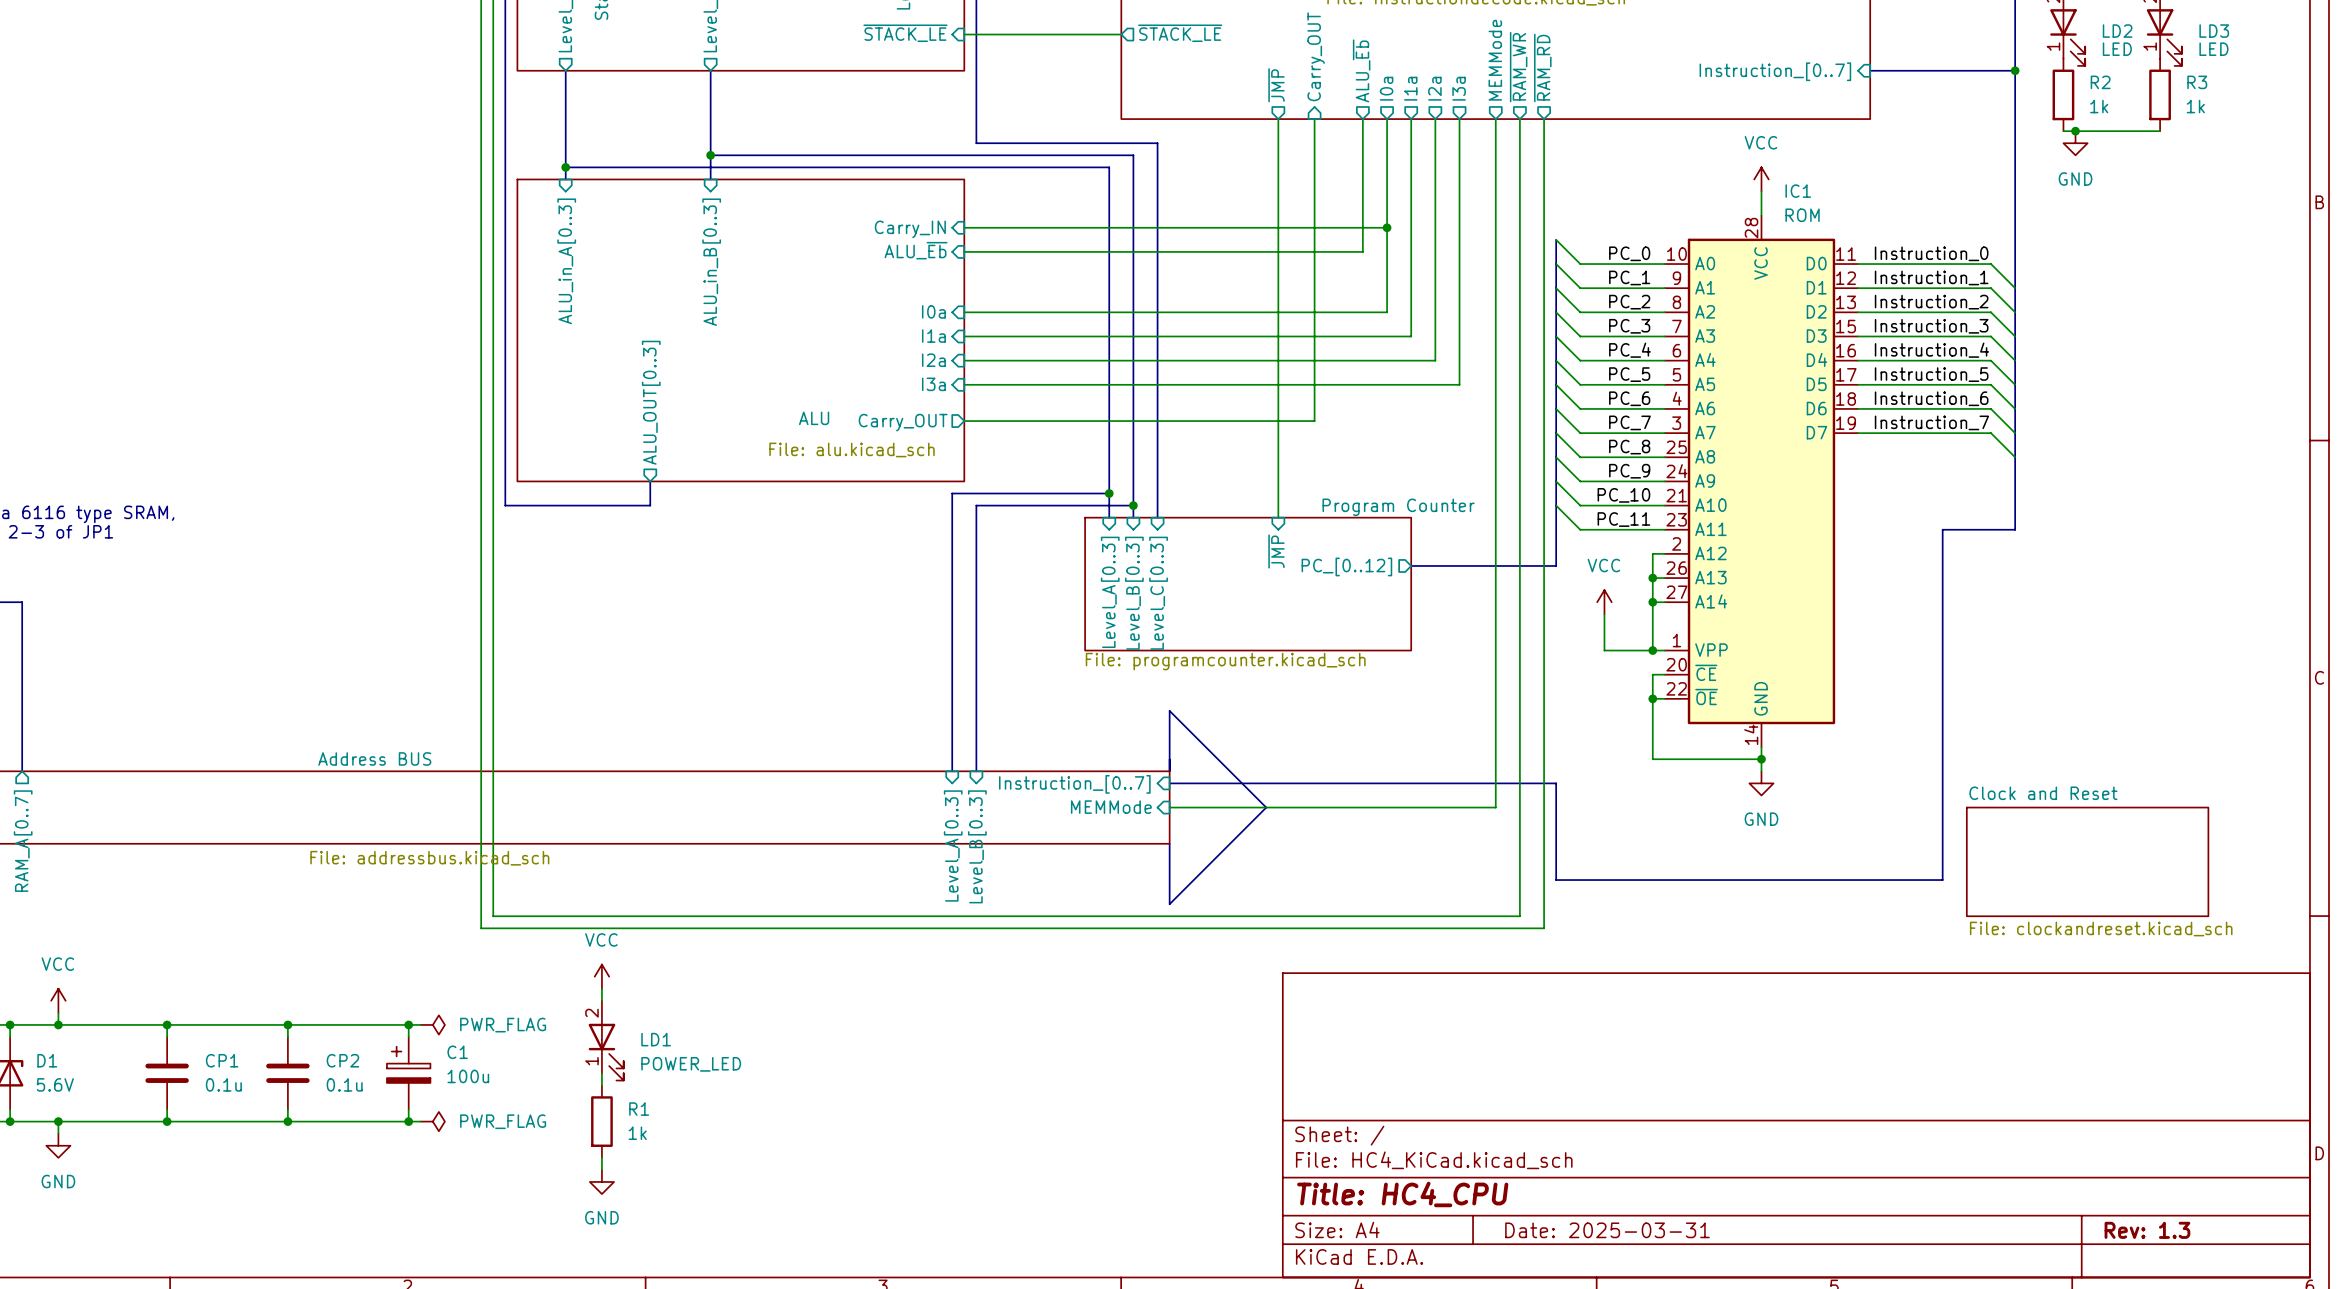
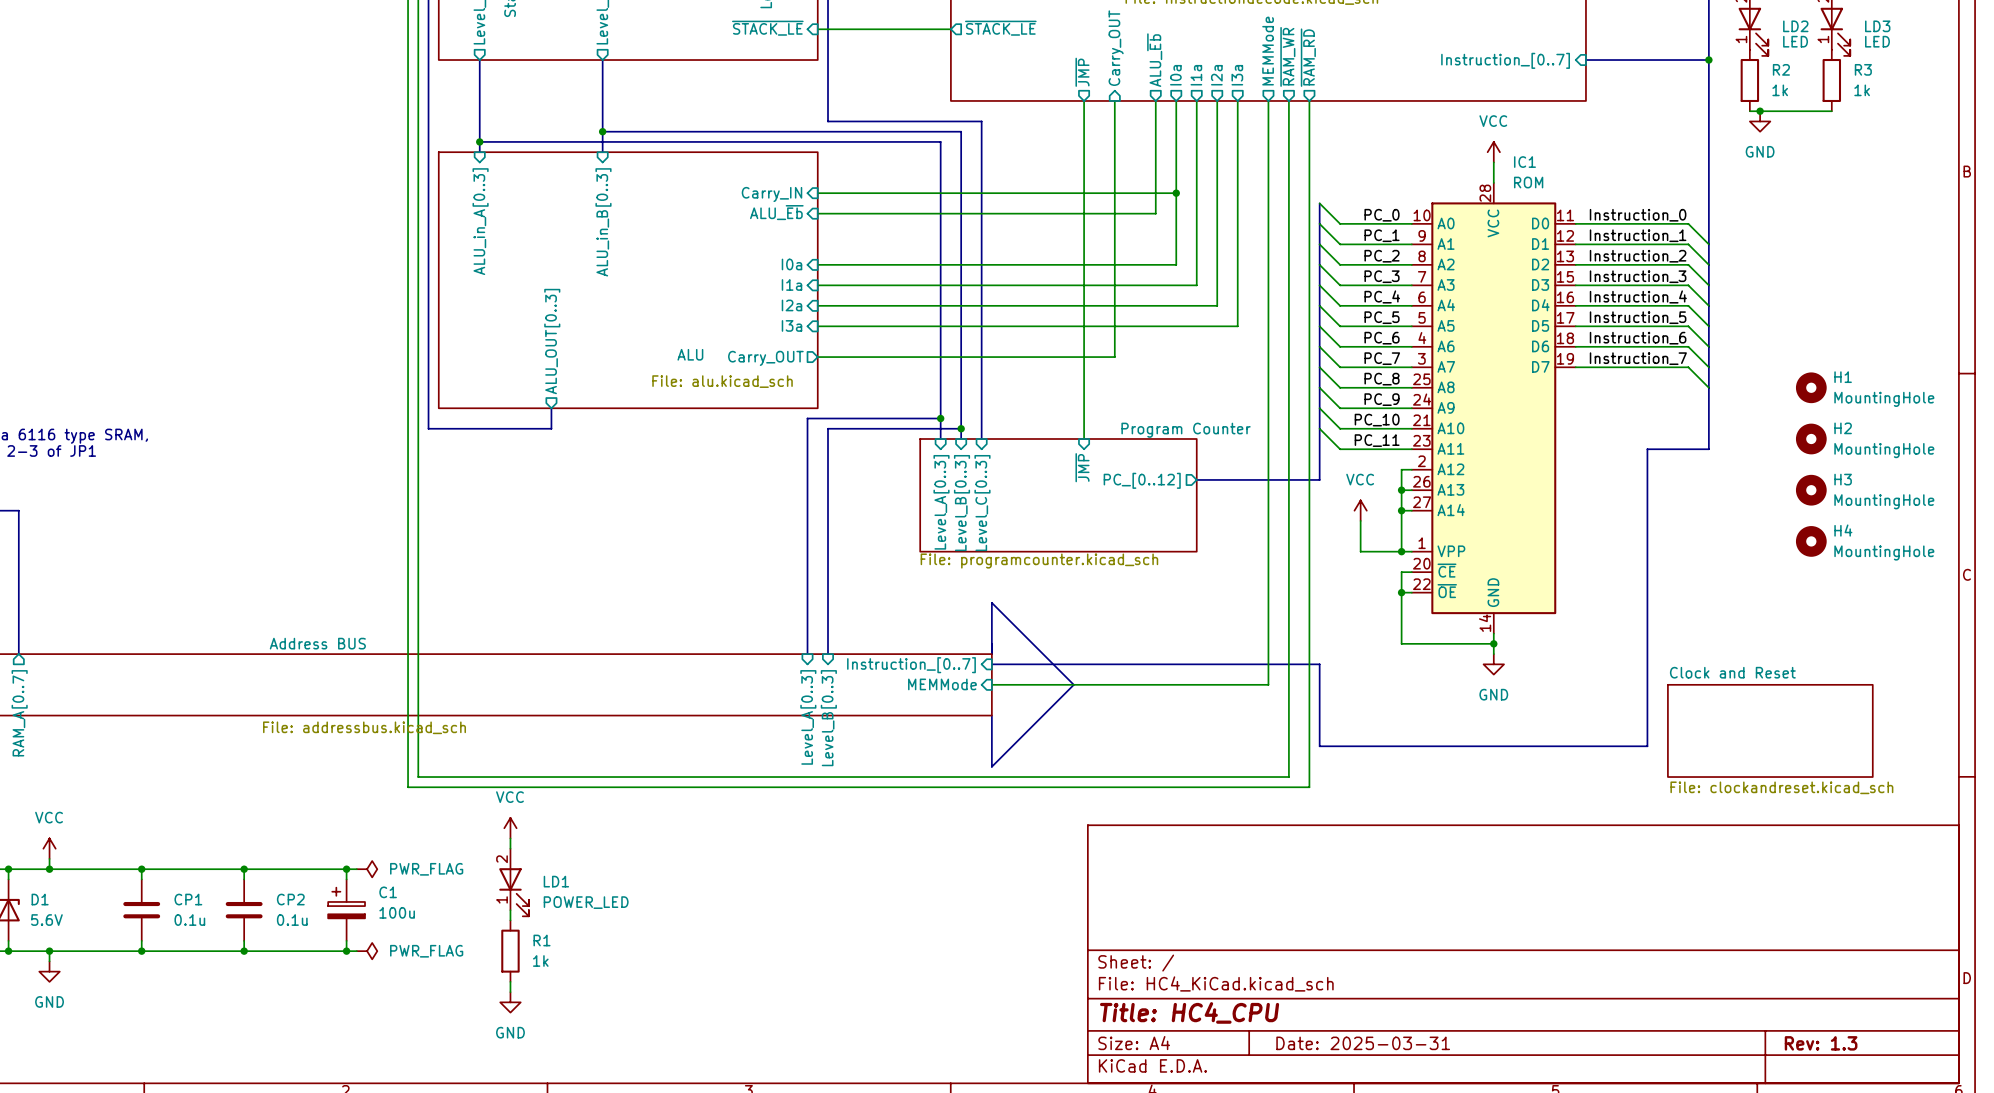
H1: none -> MountingHole (1811, 387)
H2: none -> MountingHole (1811, 438)
H3: none -> MountingHole (1811, 490)
H4: none -> MountingHole (1811, 541)

